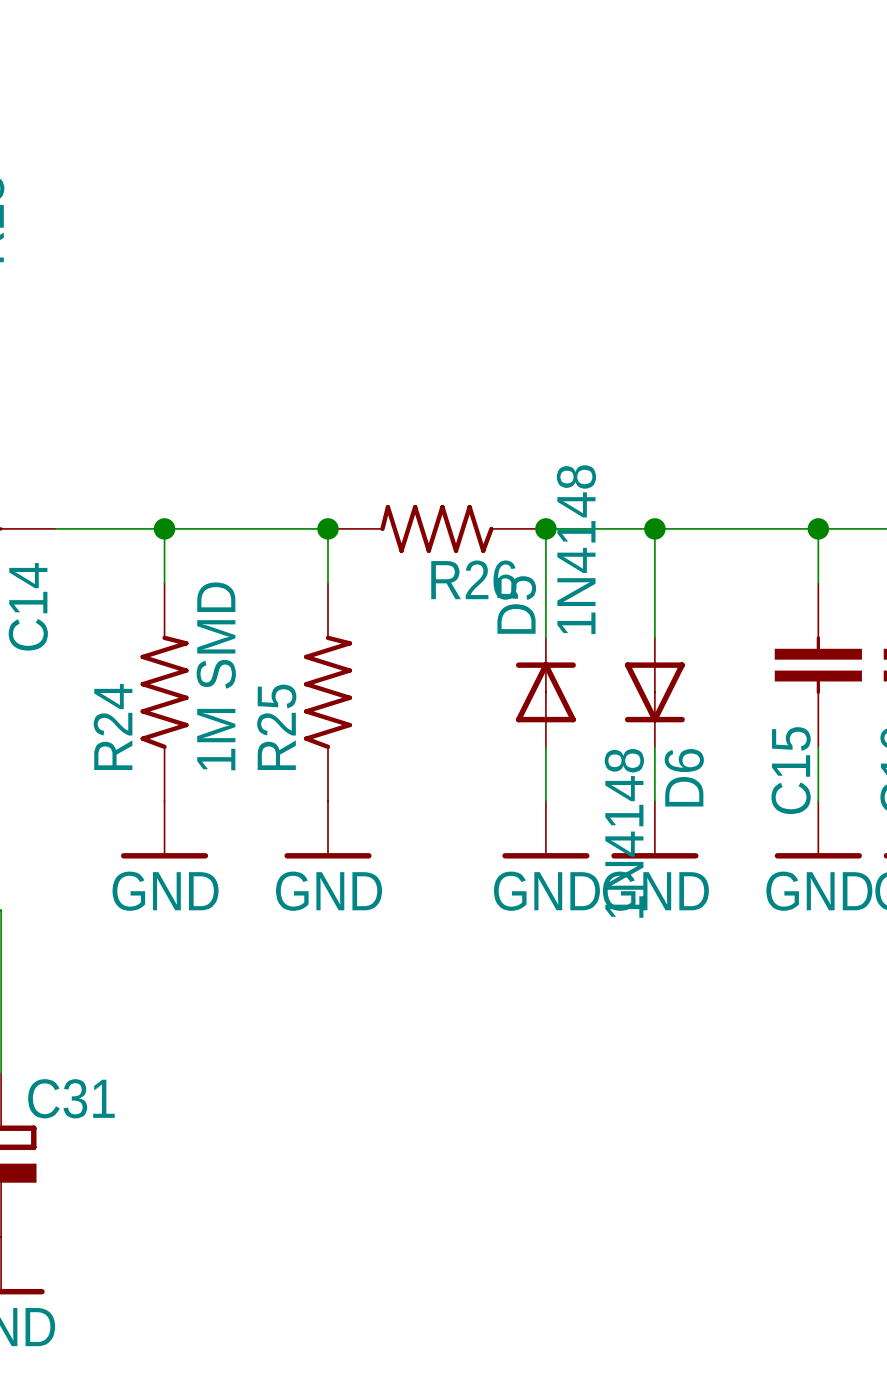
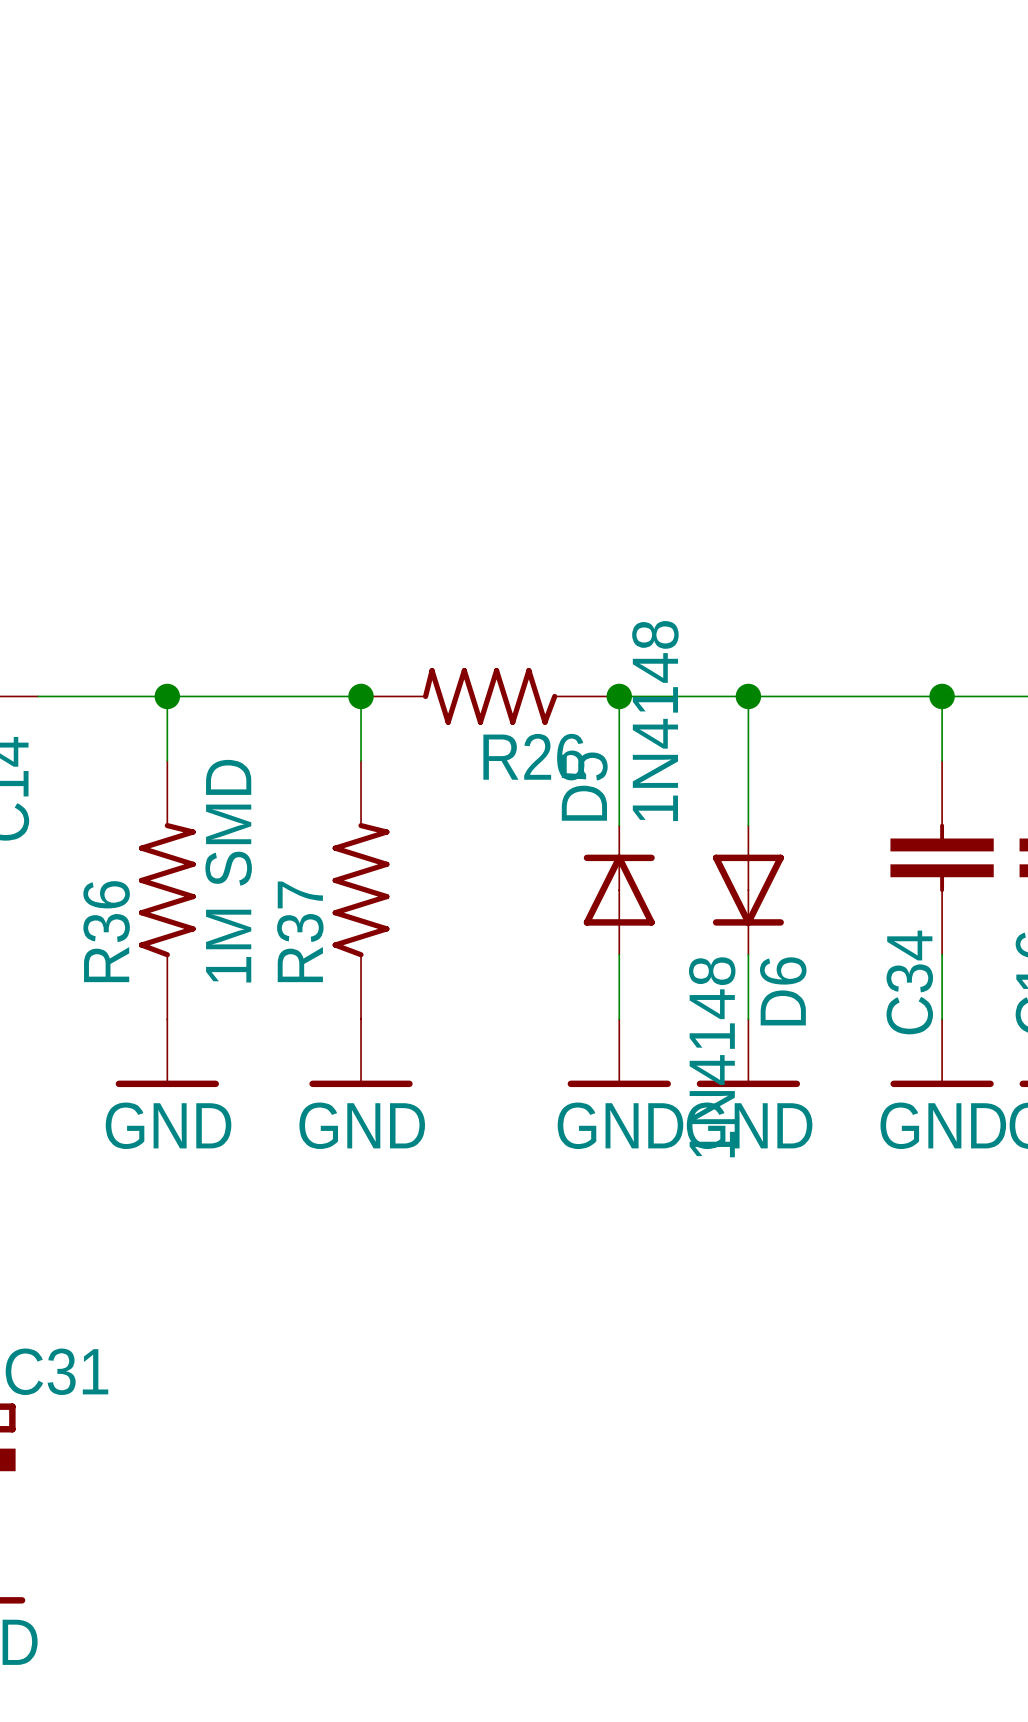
R24 name: R24 (113, 727) -> R36 (106, 931)
R25 name: R25 (276, 727) -> R37 (300, 931)
C15 name: C15 (791, 770) -> C34 (909, 982)

